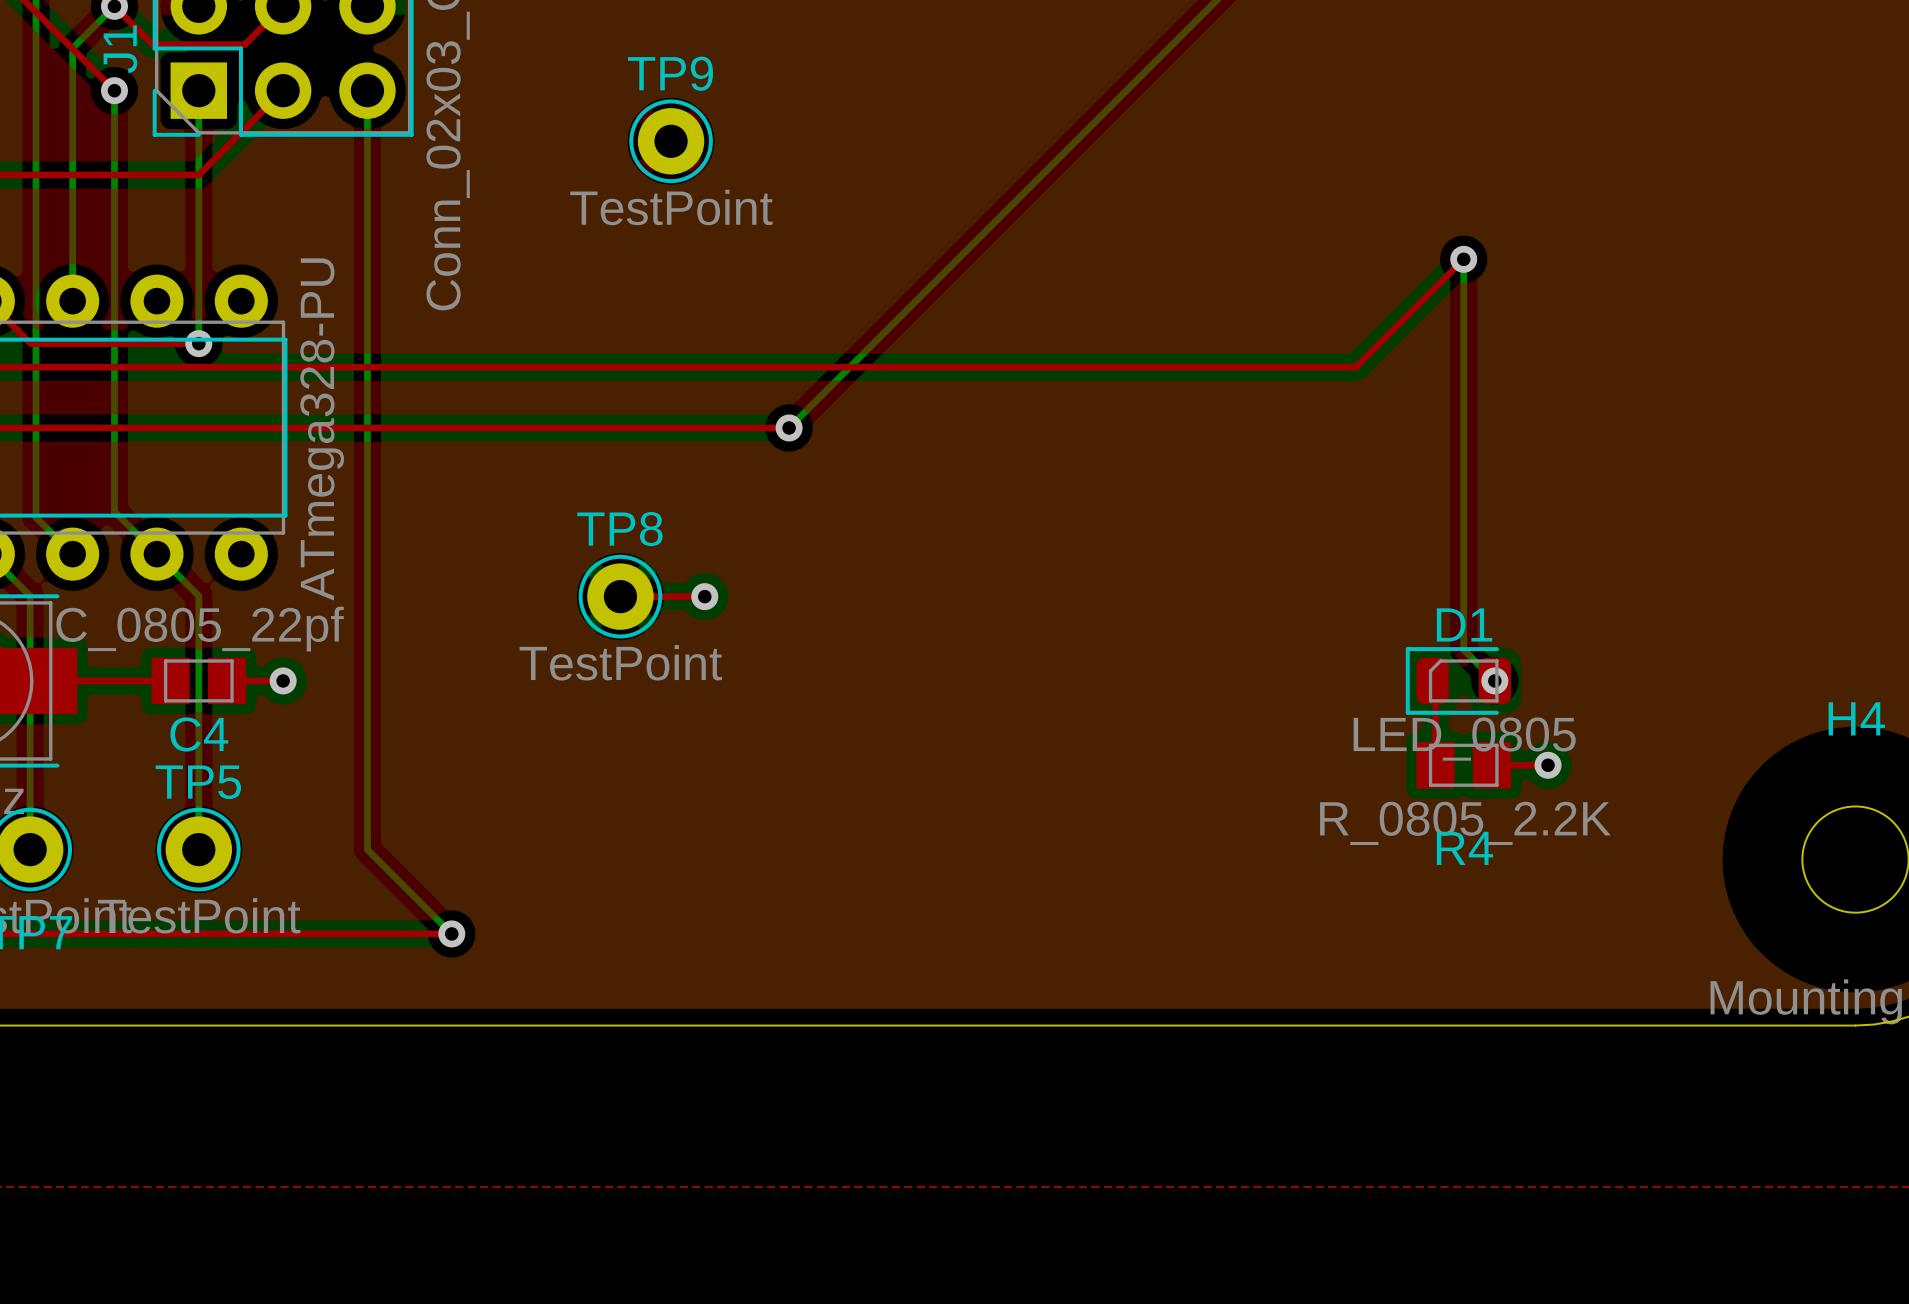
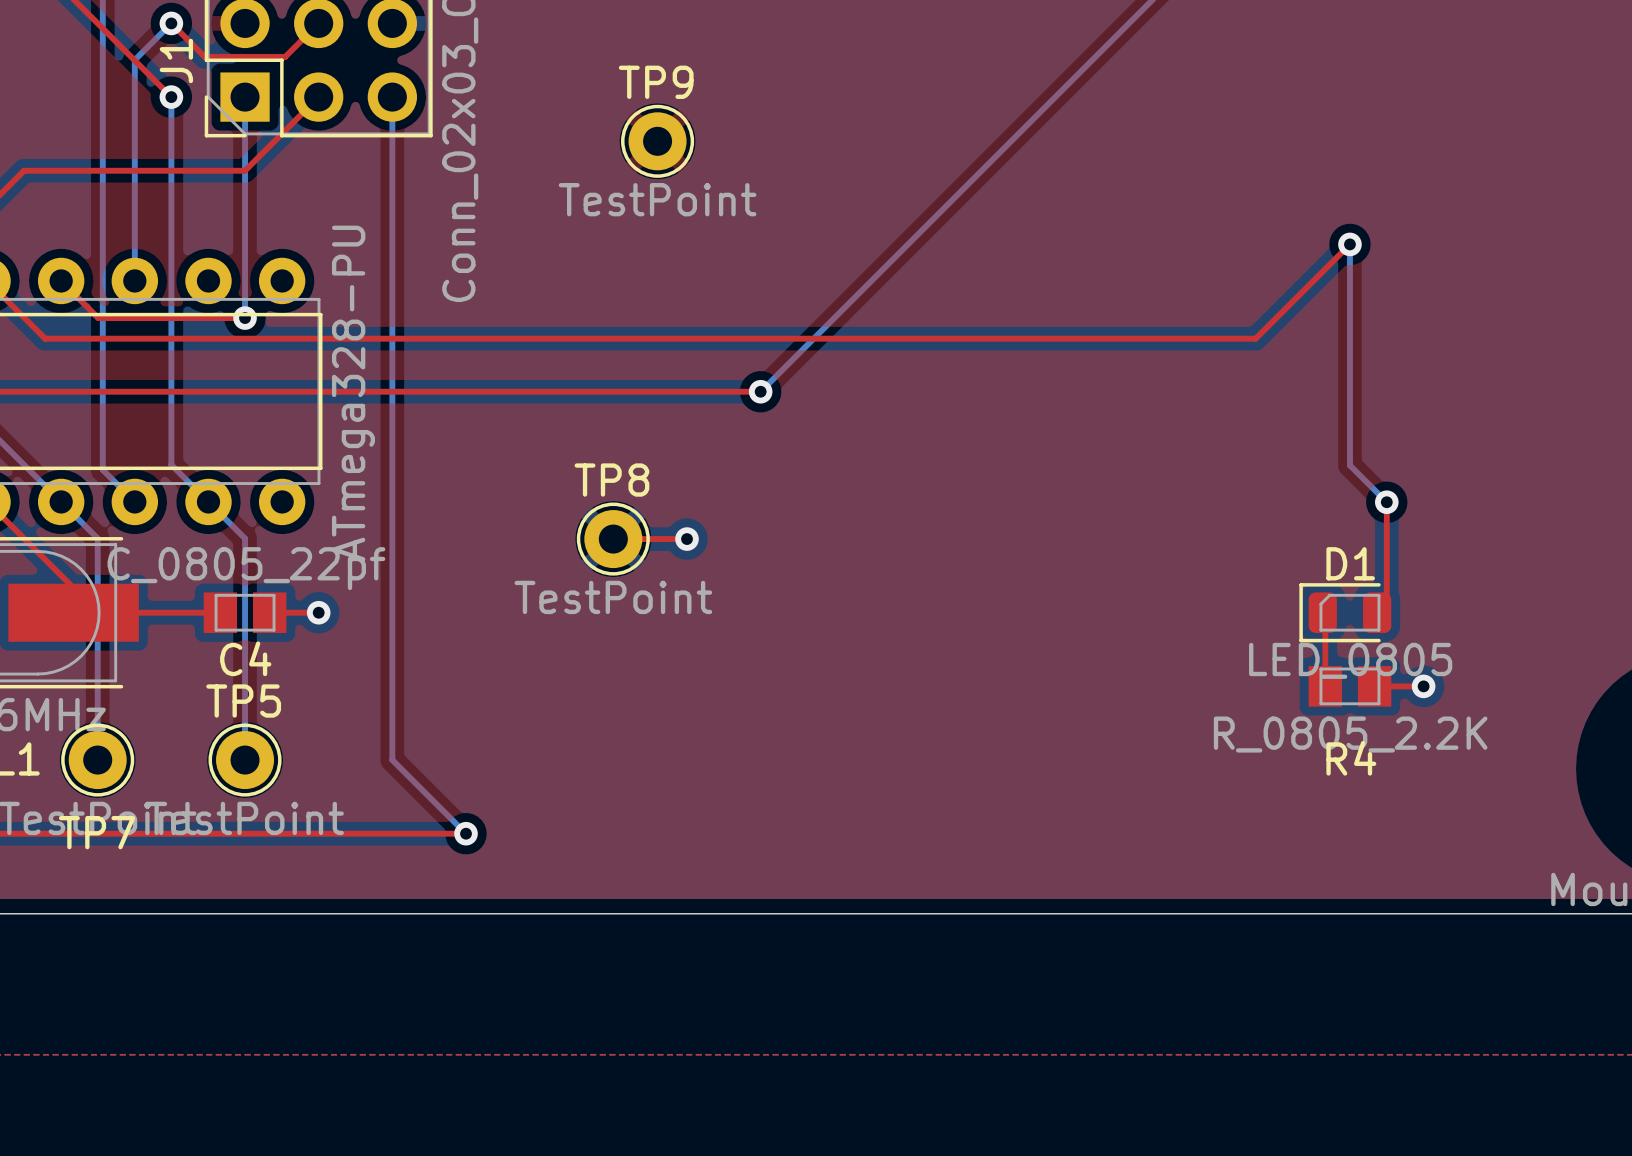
bottom track: (1463, 512) (1463, 649) (1494, 680) -> (1349, 465) (1386, 502)
top track: none -> (1386, 502) (1386, 603) (1377, 612)
via position: (1494, 680) -> (1386, 502)

